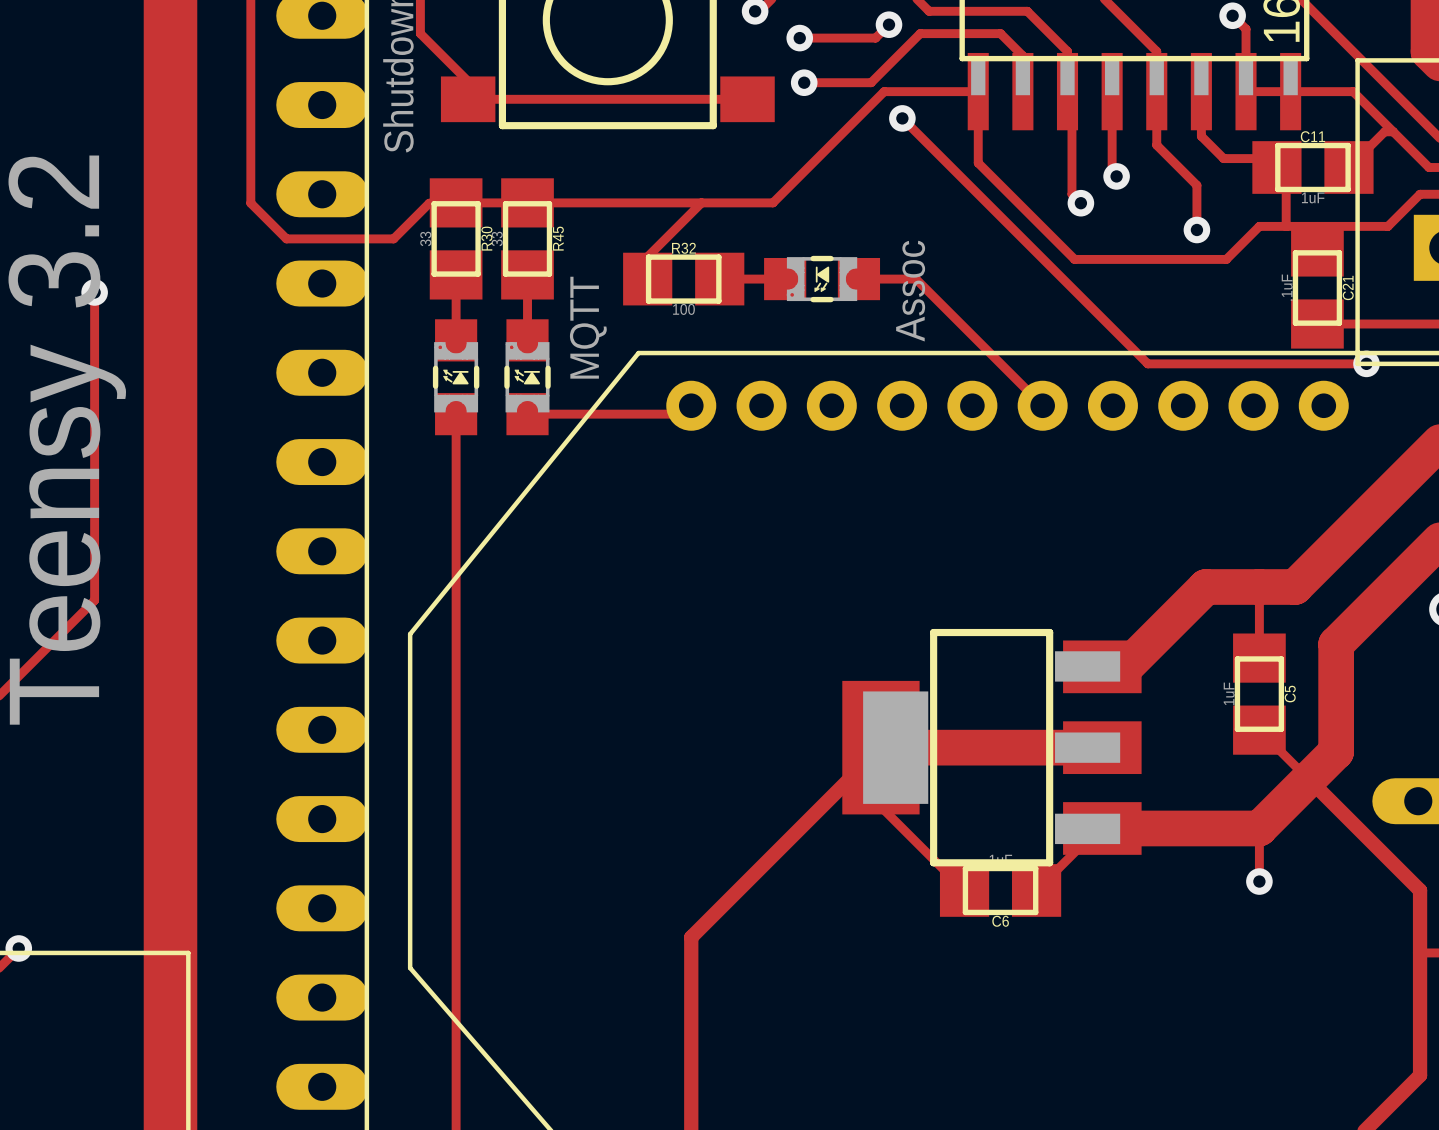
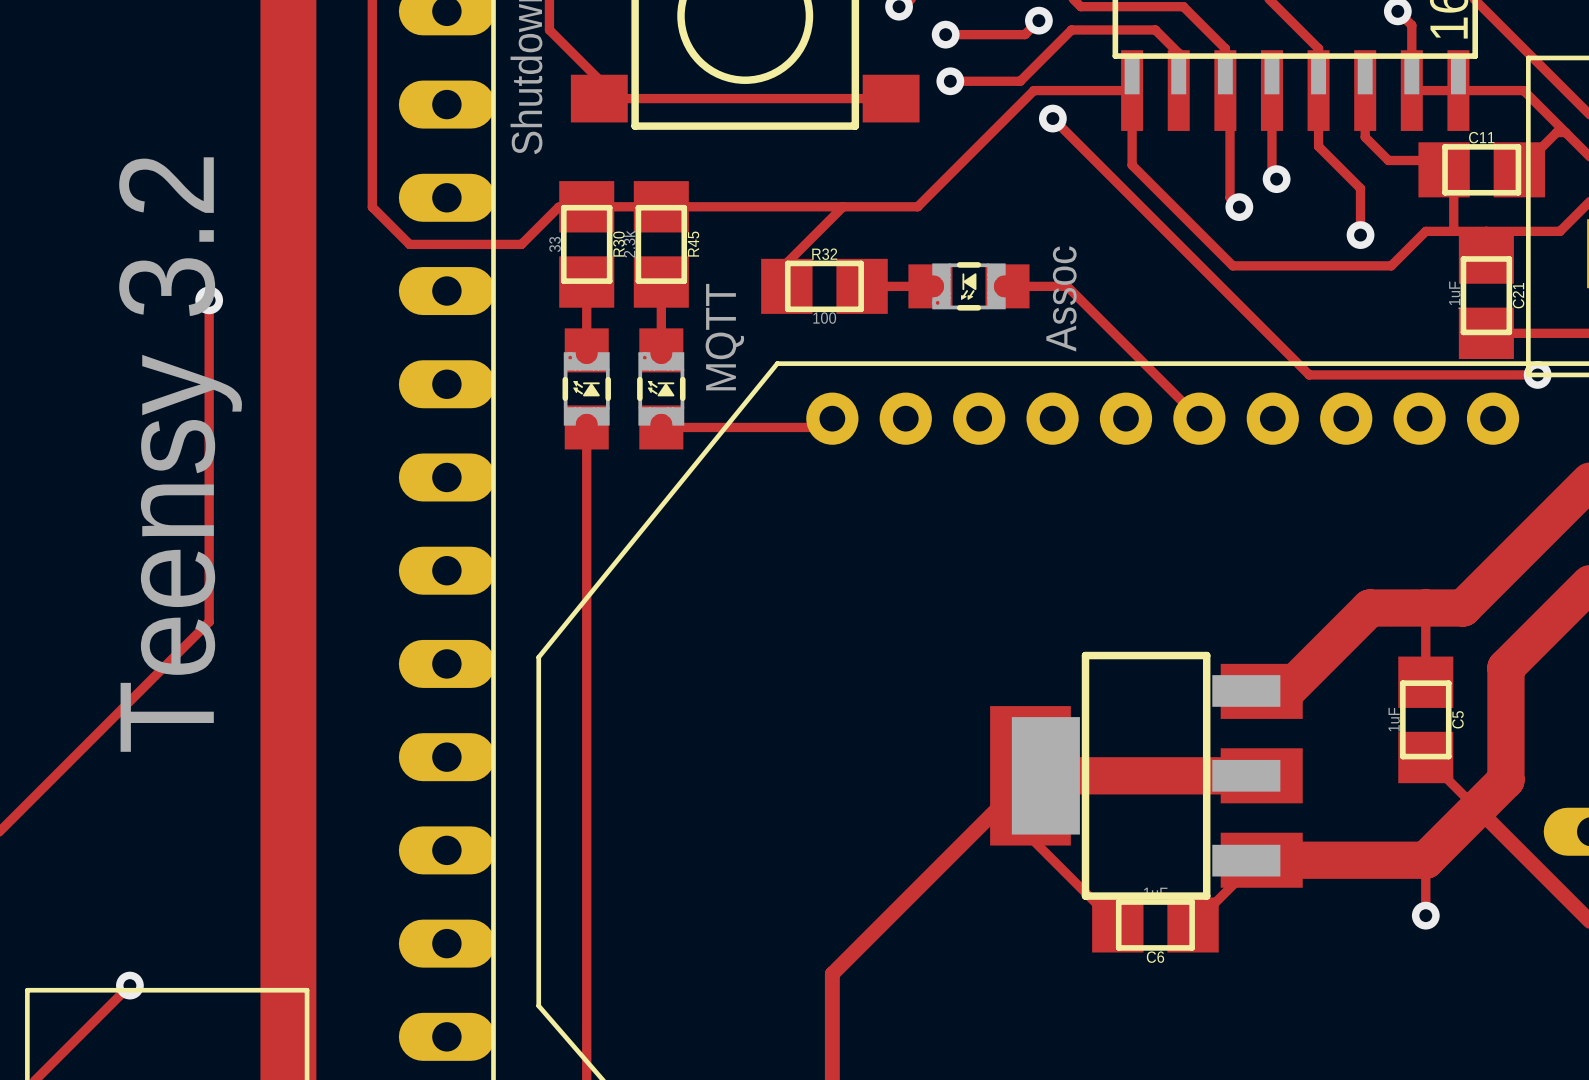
C11 value: 1uF (1313, 197) -> none
R45 value: 33 (497, 238) -> 2.3k (629, 244)

